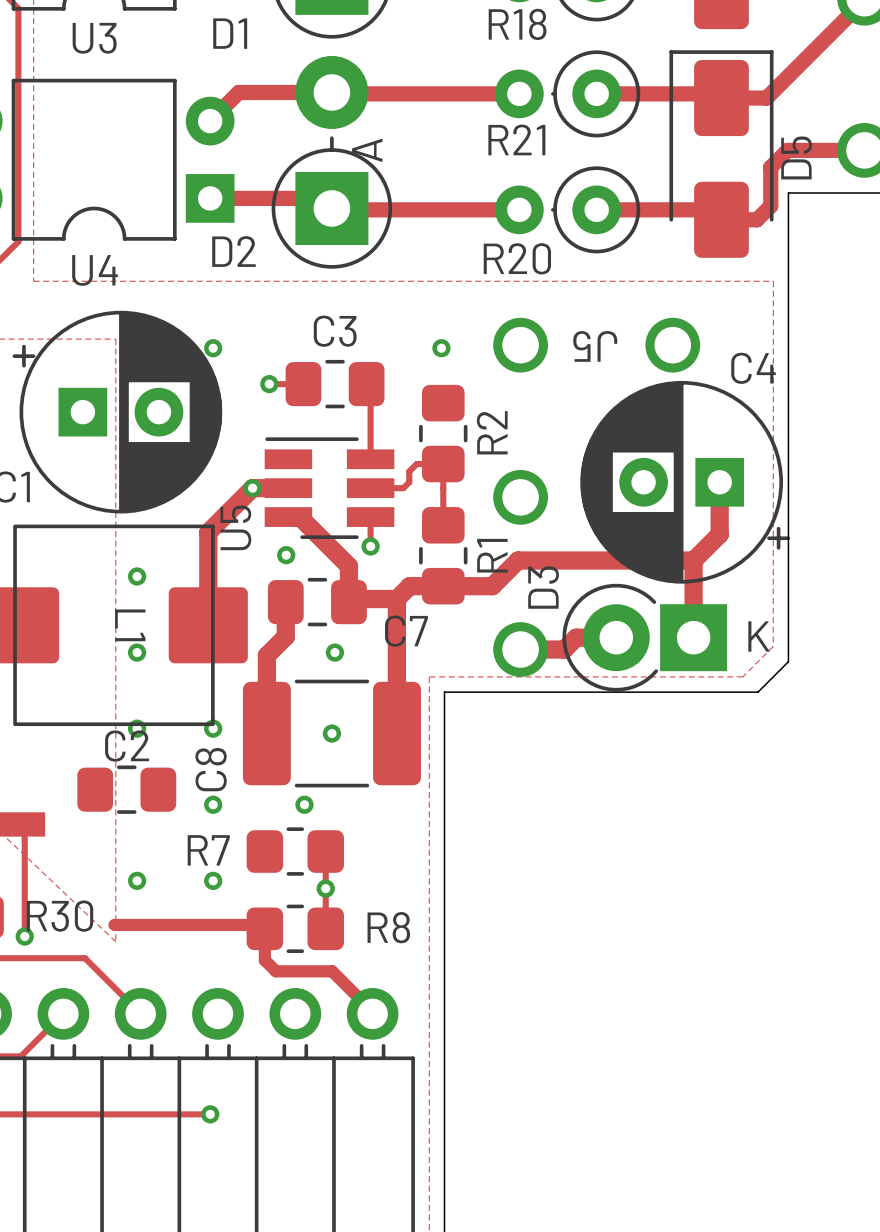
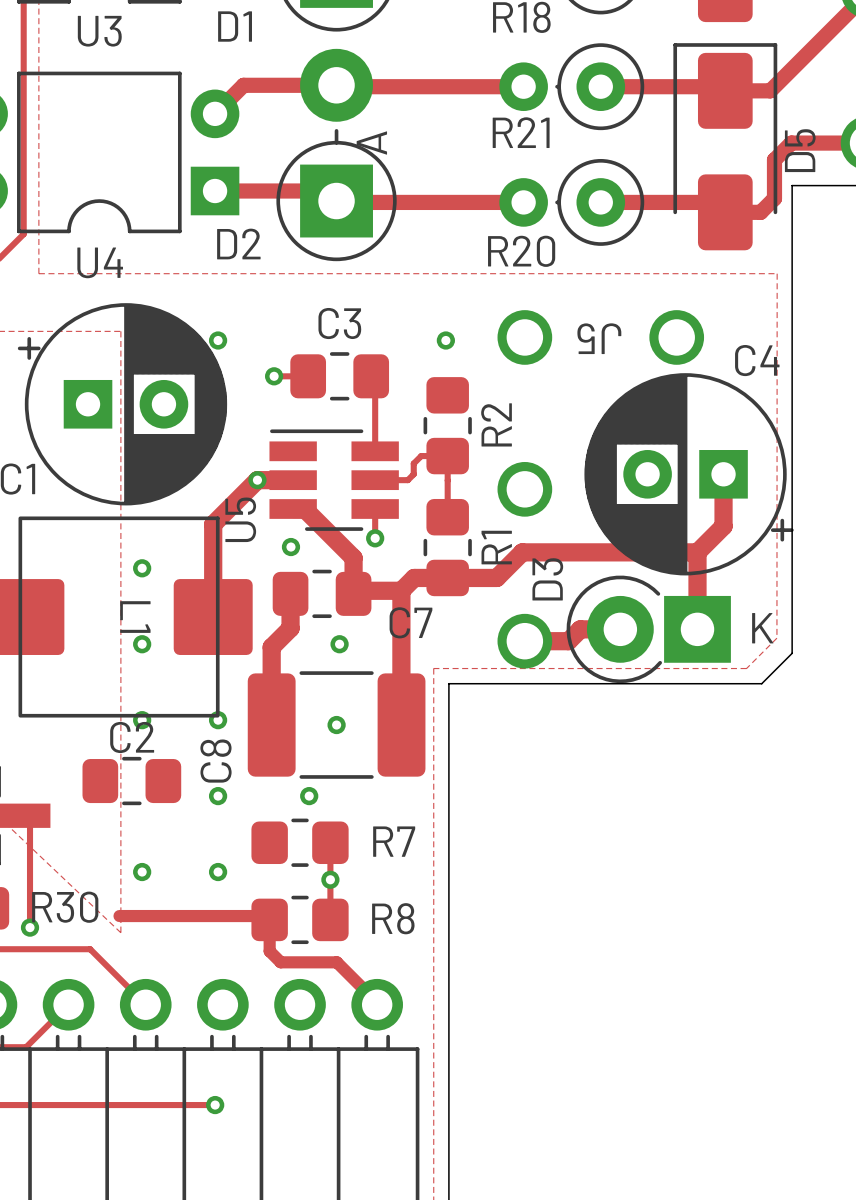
R7 name position: R7 (208, 850) -> R7 (394, 841)

